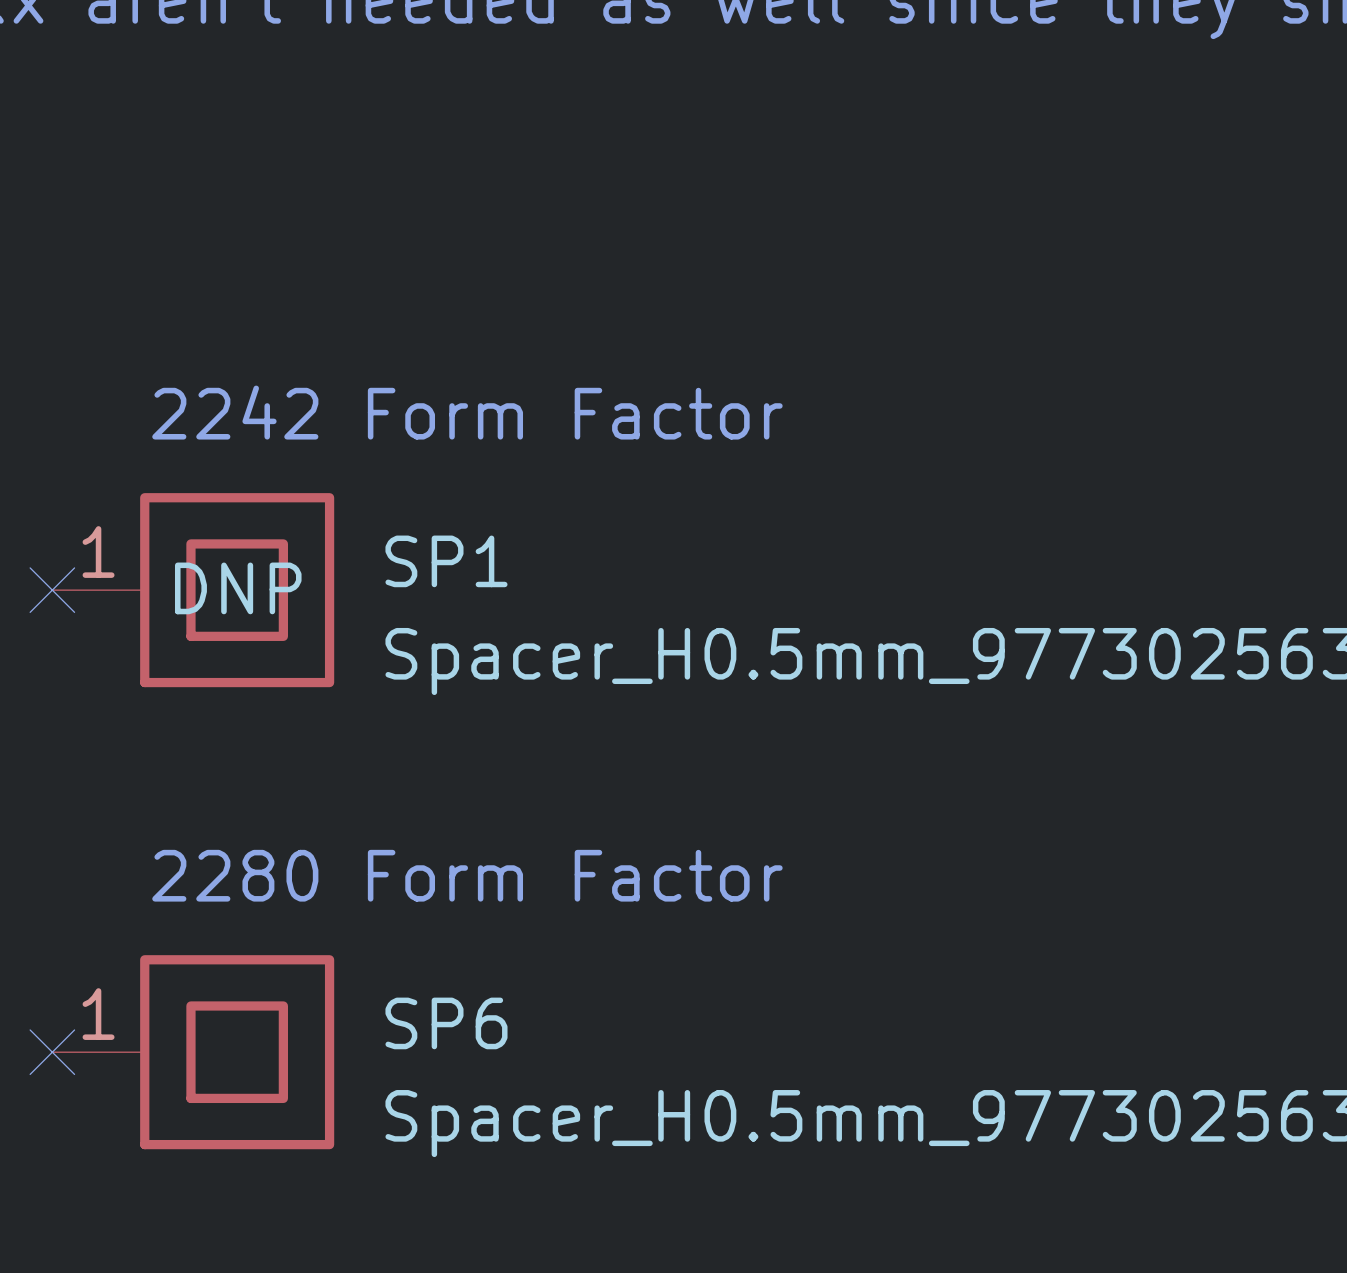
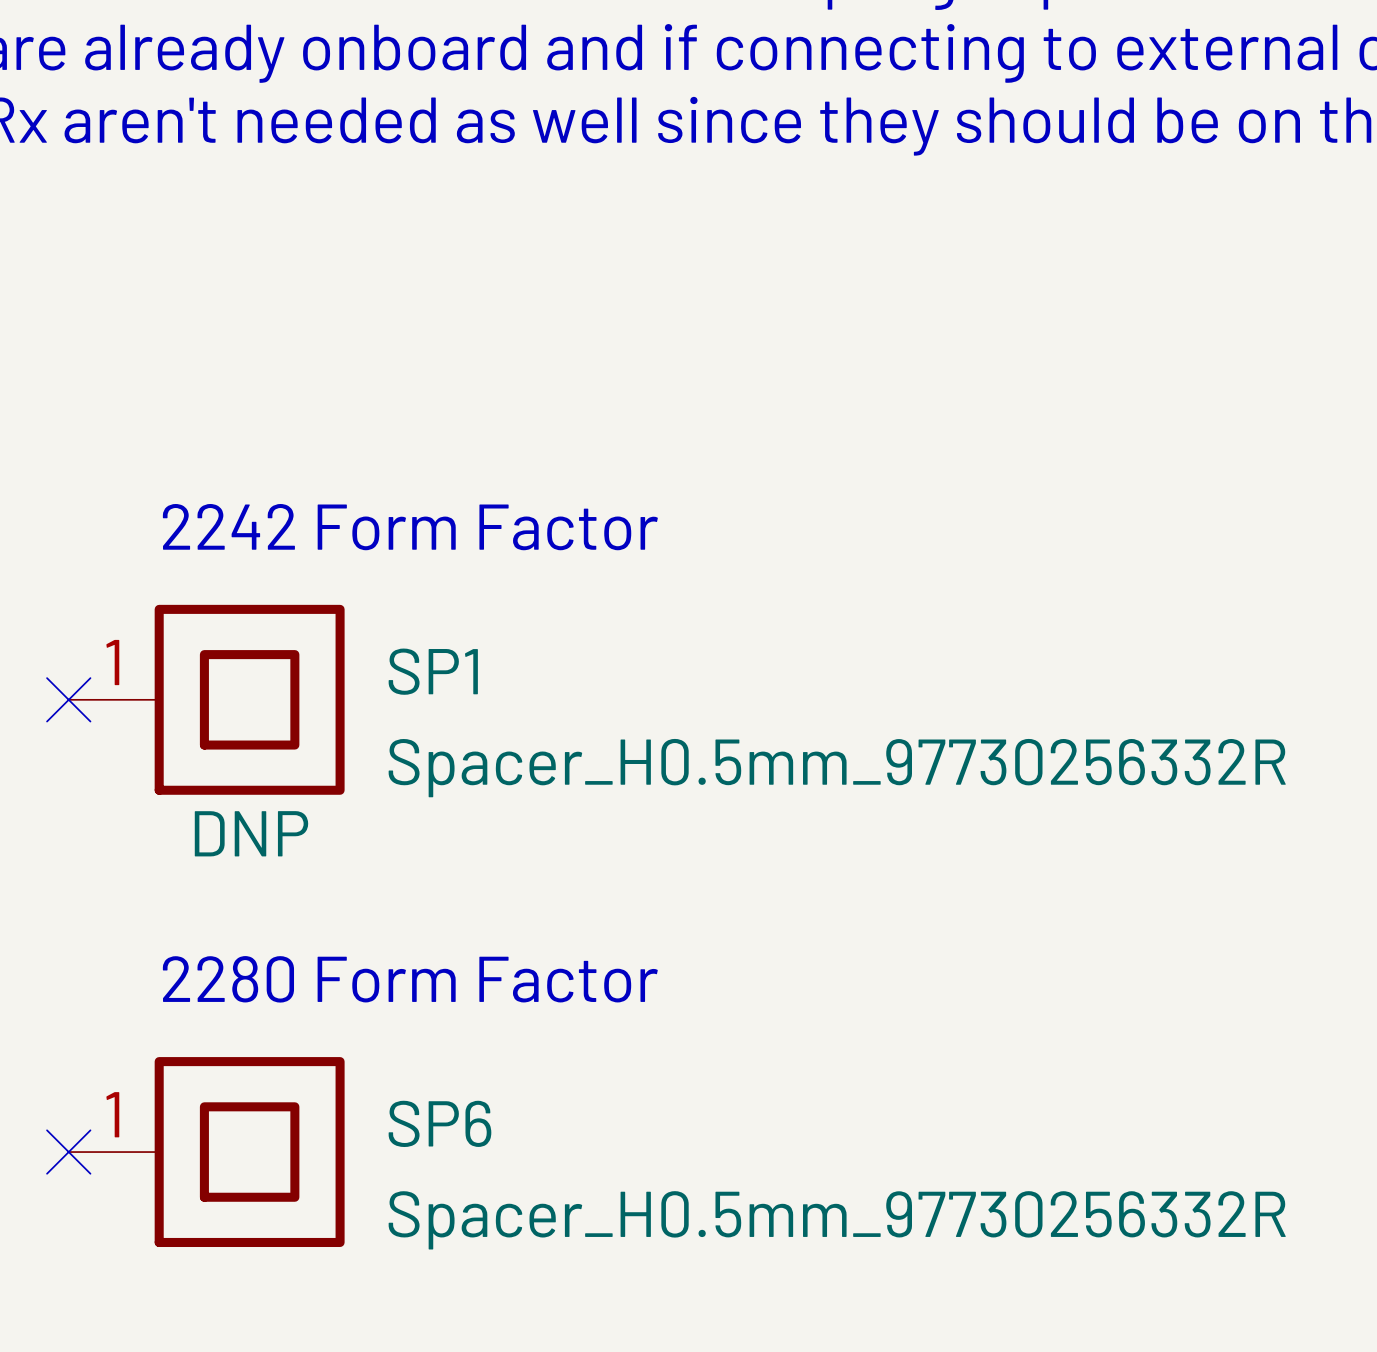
SP1 text position: DNP (238, 588) -> DNP (251, 833)

